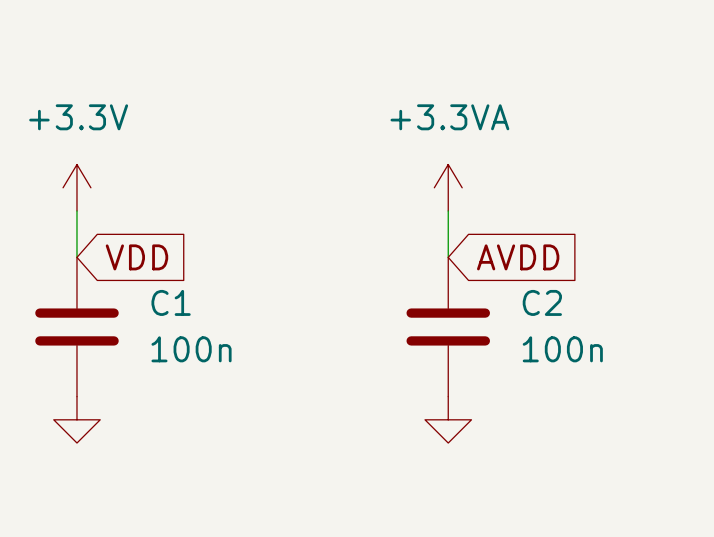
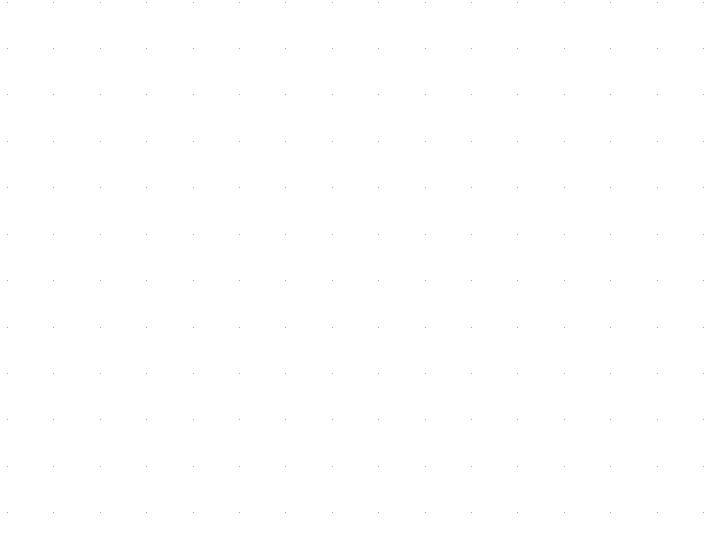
power symbol: +3.3V (76, 187) -> none
power symbol: +3.3VA (448, 187) -> none
wire: (76, 210) (76, 257) -> none
wire: (448, 210) (448, 257) -> none
global label: VDD (136, 257) -> none
global label: AVDD (518, 257) -> none
C1: 100n (76, 327) -> none
C2: 100n (448, 327) -> none
power symbol: (76, 419) -> none
power symbol: (448, 419) -> none

